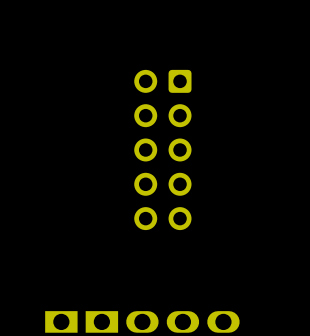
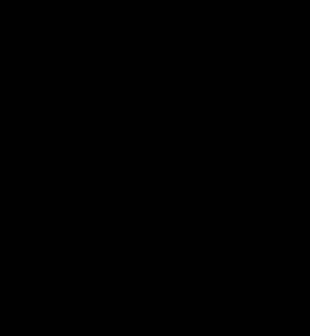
part: (162, 149) -> none
part: (142, 321) -> none

